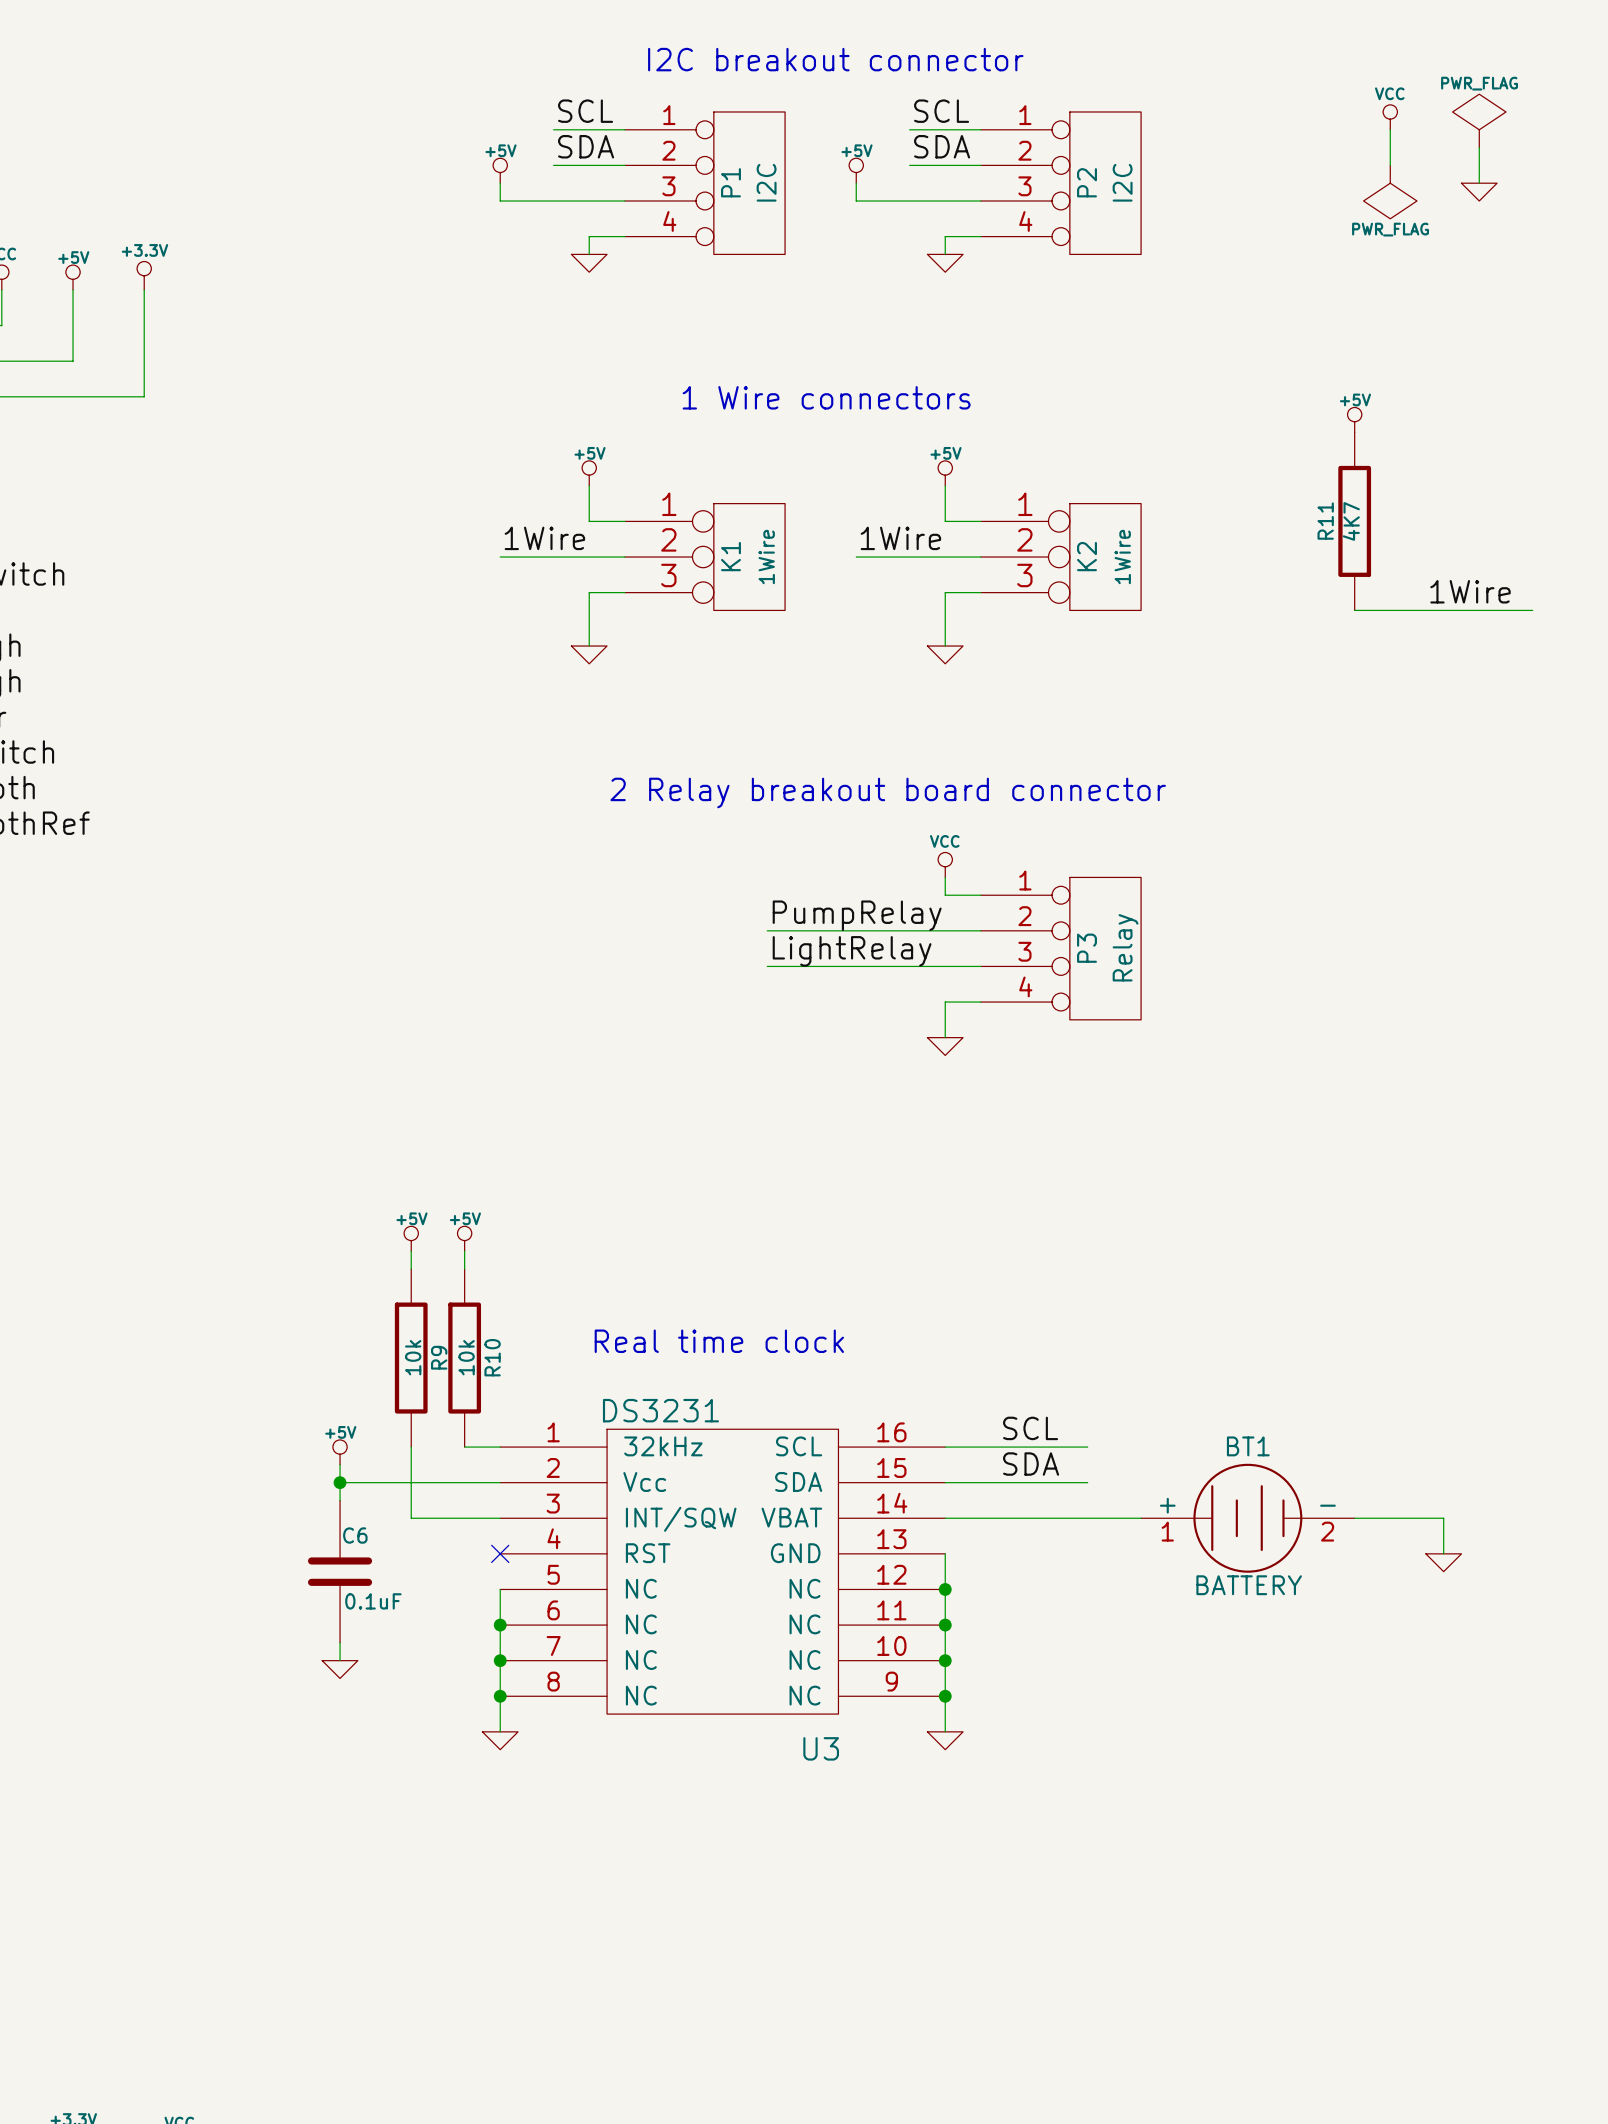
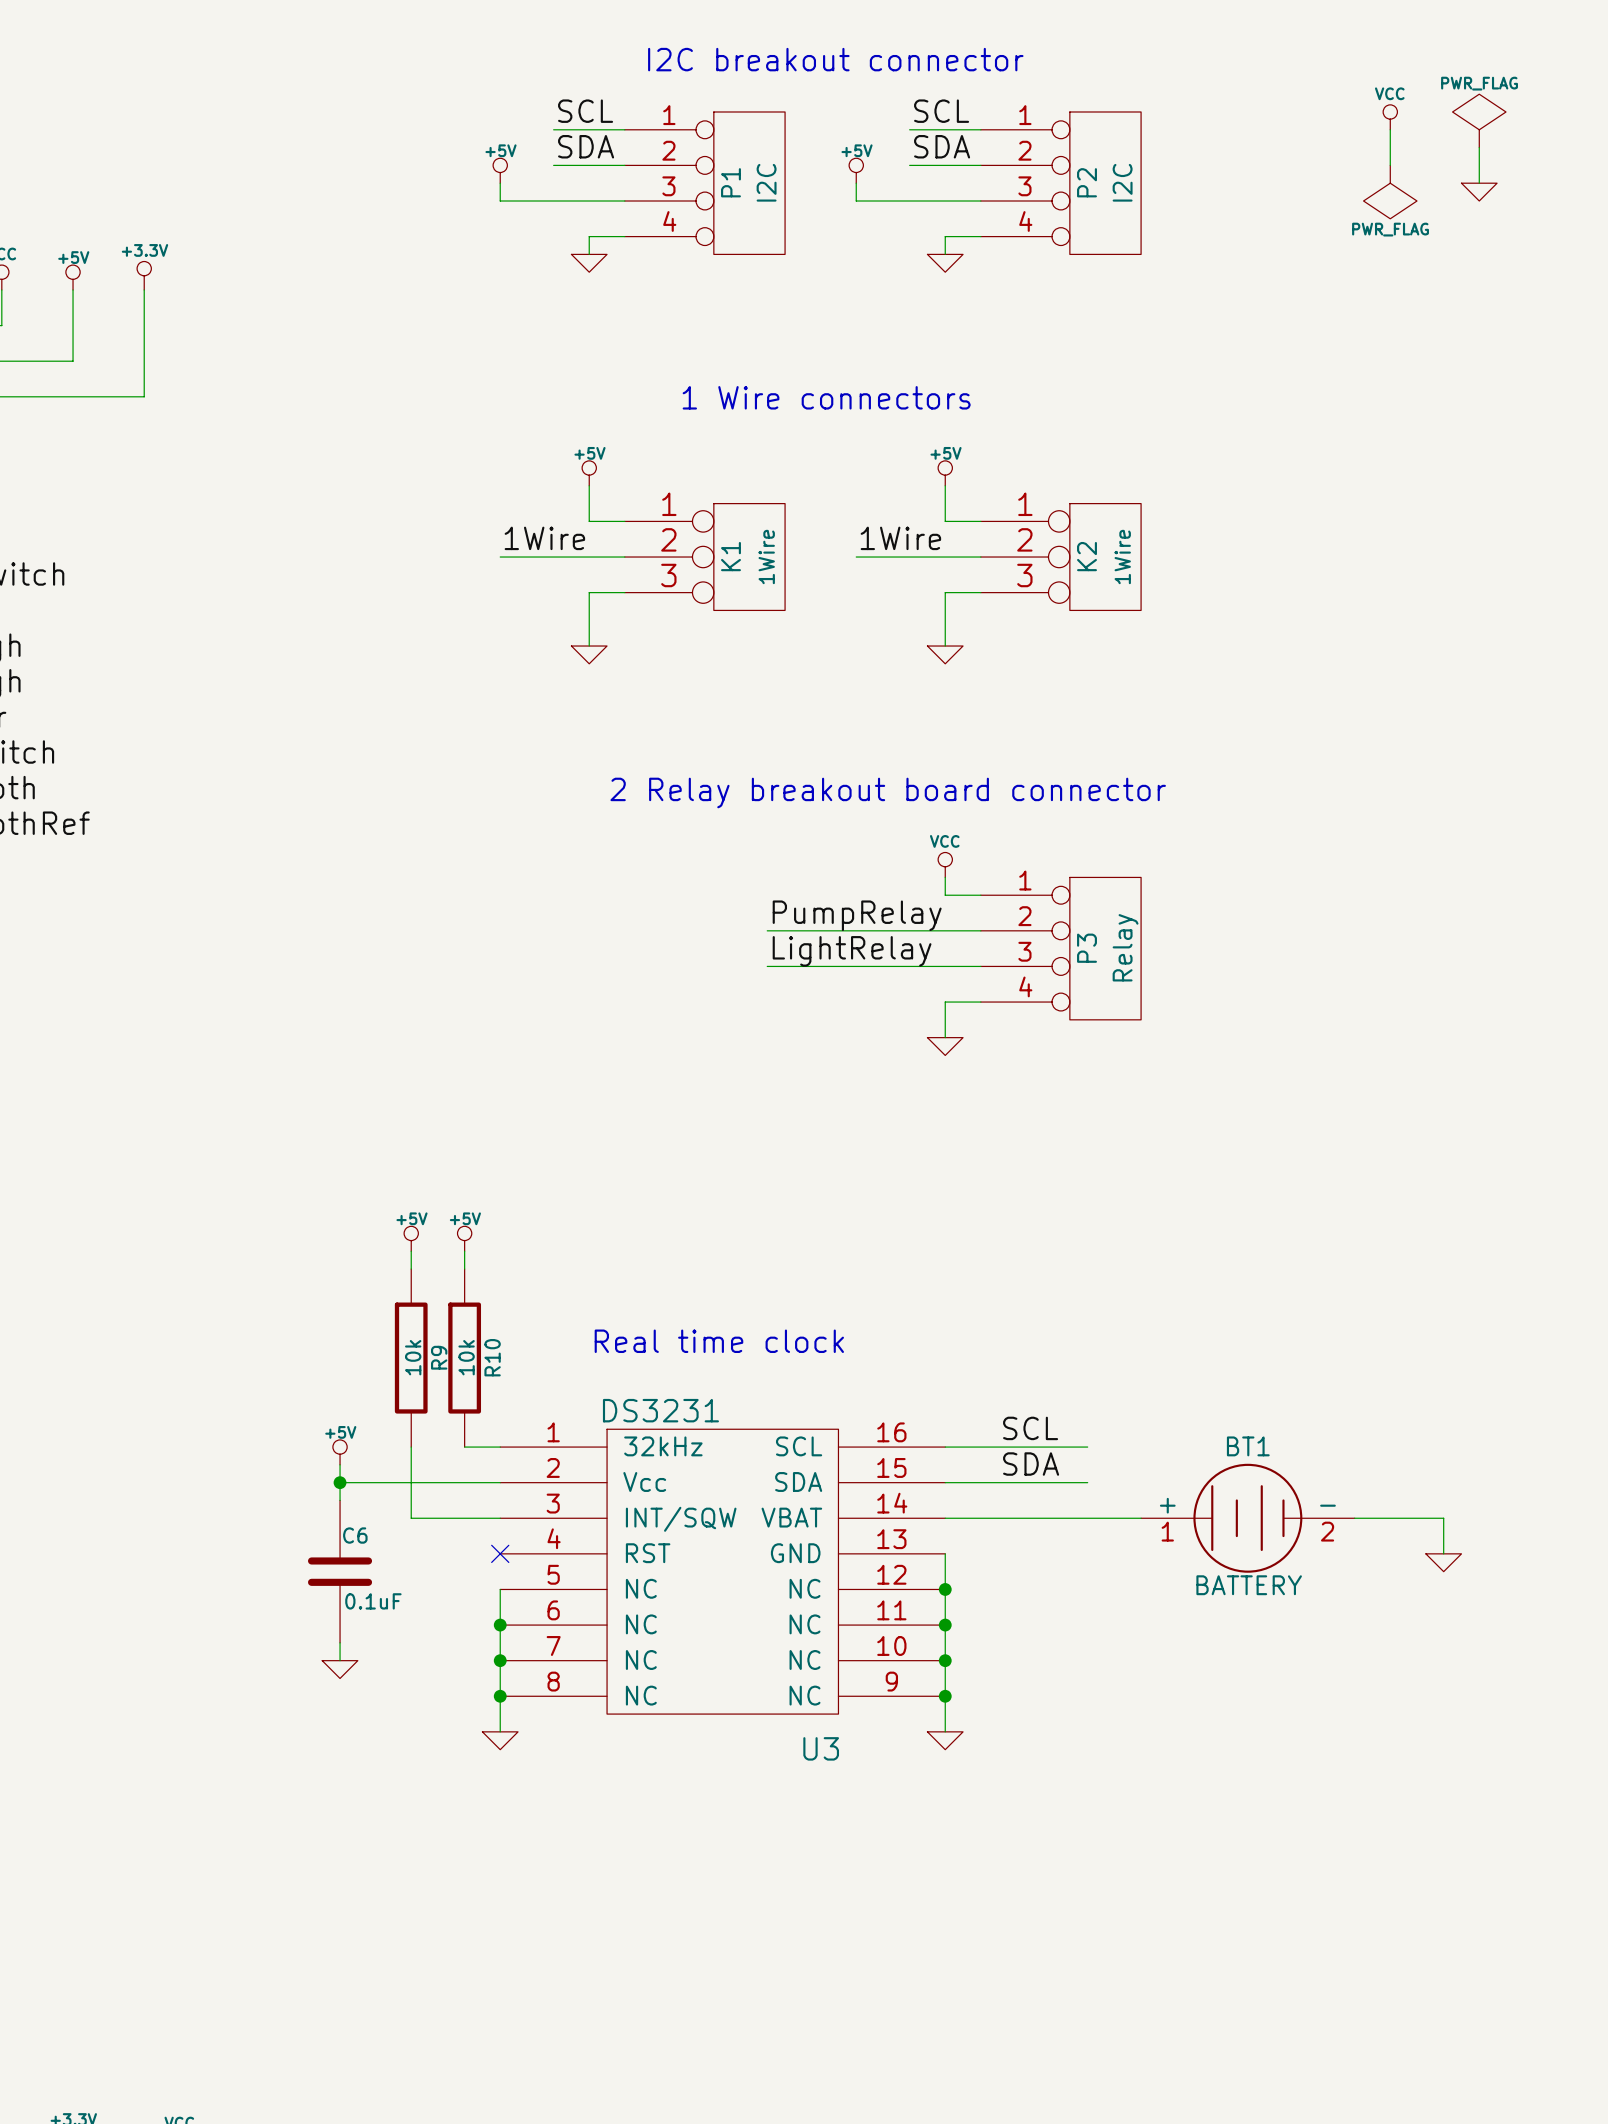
power symbol: +5V (1354, 419) -> none
R11: 4K7 (1354, 521) -> none
label: 1Wire (1470, 591) -> none
wire: (1354, 610) (1532, 610) -> none

